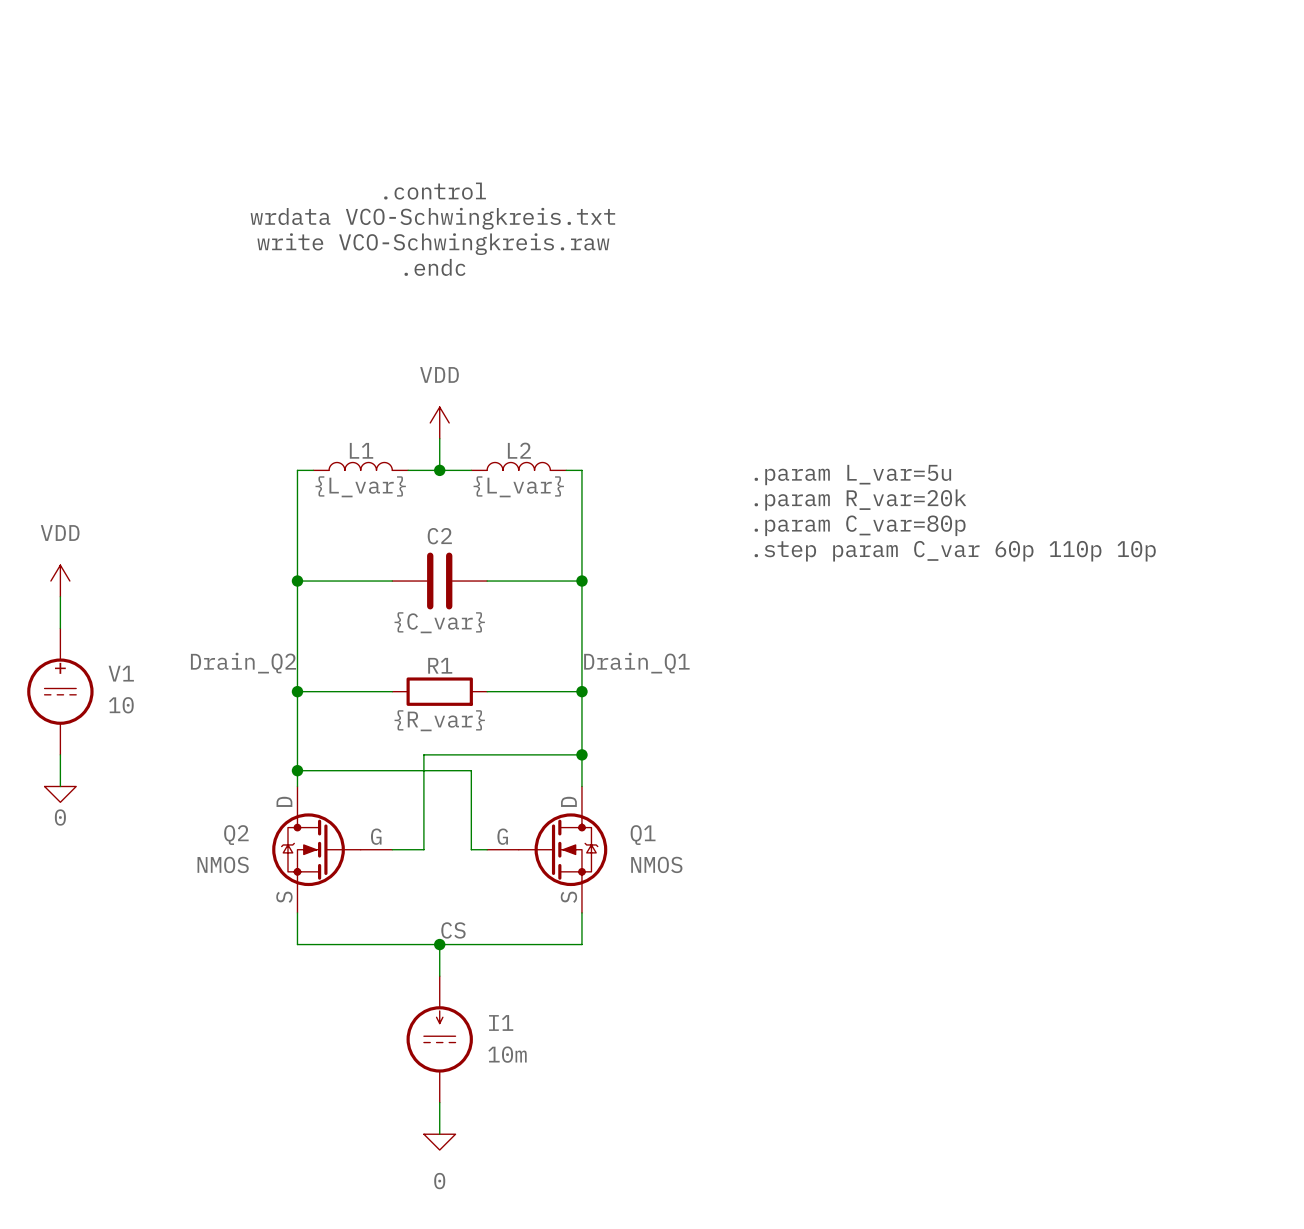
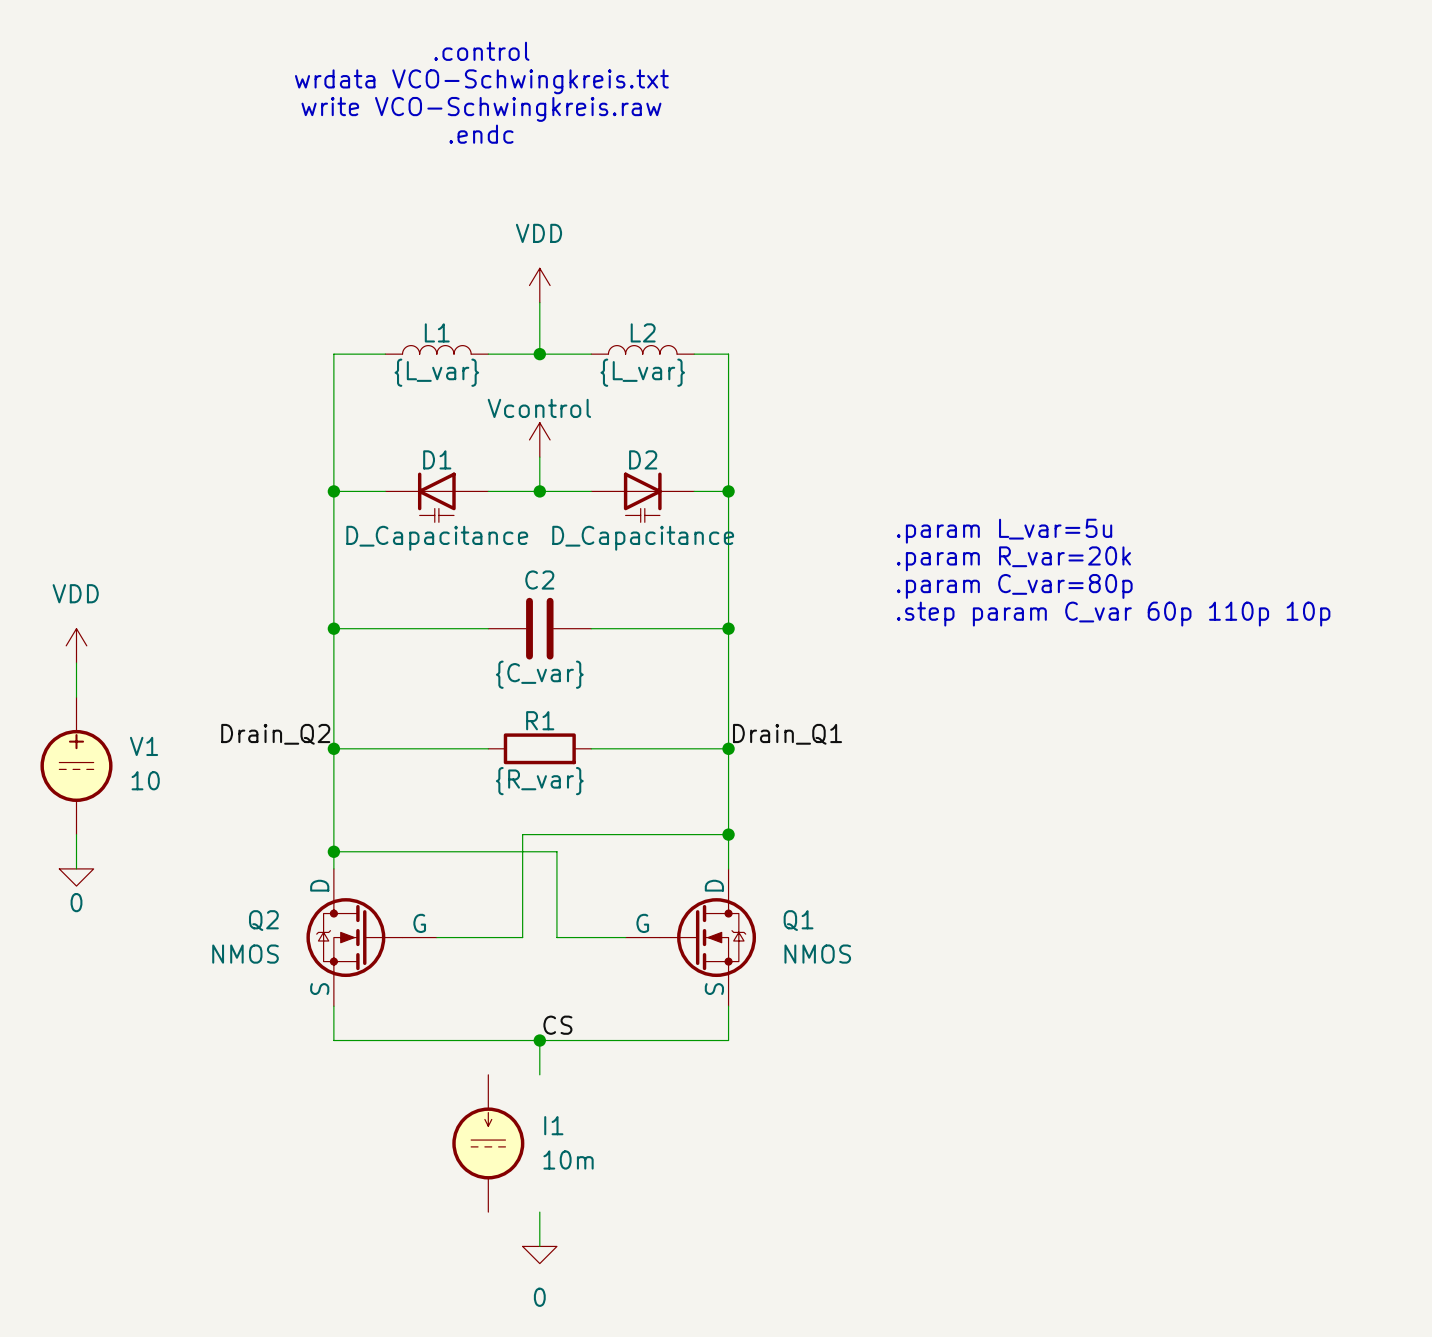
text position: .control (435, 191) -> .control (481, 51)
text position: wrdata VCO-Schwingkreis.txt (432, 218) -> wrdata VCO-Schwingkreis.txt (481, 81)
text position: write VCO-Schwingkreis.raw (433, 244) -> write VCO-Schwingkreis.raw (481, 109)
wire: none -> (539, 302) (539, 354)
text position: .endc (435, 267) -> .endc (481, 134)
junction: none -> (539, 354)
wire: none -> (694, 354) (728, 354) (728, 868)
power symbol: none -> Vcontrol (539, 439)
wire: none -> (539, 457) (539, 491)
power symbol position: VDD (439, 422) -> VDD (539, 285)
wire: none -> (333, 491) (385, 491)
junction: none -> (333, 491)
wire: (439, 438) (439, 470) -> (488, 491) (591, 491)
wire: none -> (694, 491) (728, 491)
junction: none -> (728, 491)
D1: none -> D_Capacitance (436, 497)
D2: none -> D_Capacitance (642, 497)
L1 position: (360, 466) -> (436, 349)
L2 position: (518, 466) -> (642, 349)
wire: (297, 470) (313, 470) -> (333, 525) (333, 354) (385, 354)
wire: (408, 470) (471, 470) -> none
junction position: (439, 470) -> (539, 491)
wire: (566, 470) (581, 470) (581, 786) -> none
text position: .param L_var=5u (852, 475) -> .param L_var=5u (1004, 531)
text position: .param R_var=20k (860, 500) -> .param R_var=20k (1013, 558)
text position: .param C_var=80p (860, 525) -> .param C_var=80p (1014, 586)
text position: .step param C_var 60p 110p 10p (955, 551) -> .step param C_var 60p 110p 10p (1113, 614)
wire: none -> (333, 628) (488, 628)
wire: none -> (591, 628) (728, 628)
junction: none -> (728, 628)
wire: (297, 581) (392, 581) -> none
junction position: (297, 581) -> (333, 628)
C2 position: (439, 581) -> (539, 628)
wire: (487, 581) (581, 581) -> (488, 354) (591, 354)
junction: (581, 581) -> none
label position: Drain_Q1 (636, 663) -> Drain_Q1 (787, 734)
wire: none -> (333, 748) (488, 748)
wire: none -> (591, 748) (728, 748)
junction: none -> (728, 748)
wire: (297, 691) (392, 691) -> none
junction position: (297, 691) -> (333, 748)
R1 position: (439, 691) -> (539, 748)
wire: (487, 691) (581, 691) -> none
junction: (581, 691) -> none
wire: (471, 754) (423, 754) (423, 849) -> (522, 834) (522, 851) (556, 851) (556, 937) (625, 937)
wire: none -> (642, 834) (728, 834)
junction: (581, 754) -> none
junction: none -> (728, 834)
wire: (471, 849) (487, 849) -> (522, 937) (471, 937)
Q1 position: (547, 849) -> (690, 937)
wire: (581, 912) (581, 944) -> (728, 1006) (728, 1040) (642, 1040)
label position: CS (453, 930) -> CS (557, 1025)
wire: (439, 944) (439, 976) -> (539, 1040) (539, 1074)
junction position: (439, 944) -> (539, 1040)
wire: (439, 1102) (439, 1134) -> (539, 1212) (539, 1246)
power symbol position: 0 (439, 1142) -> 0 (539, 1255)

